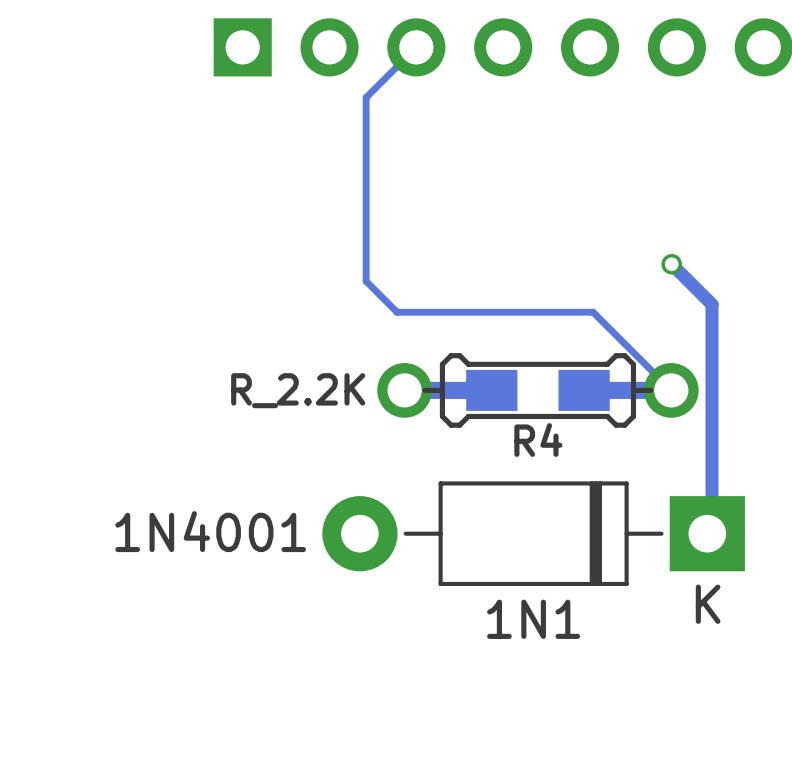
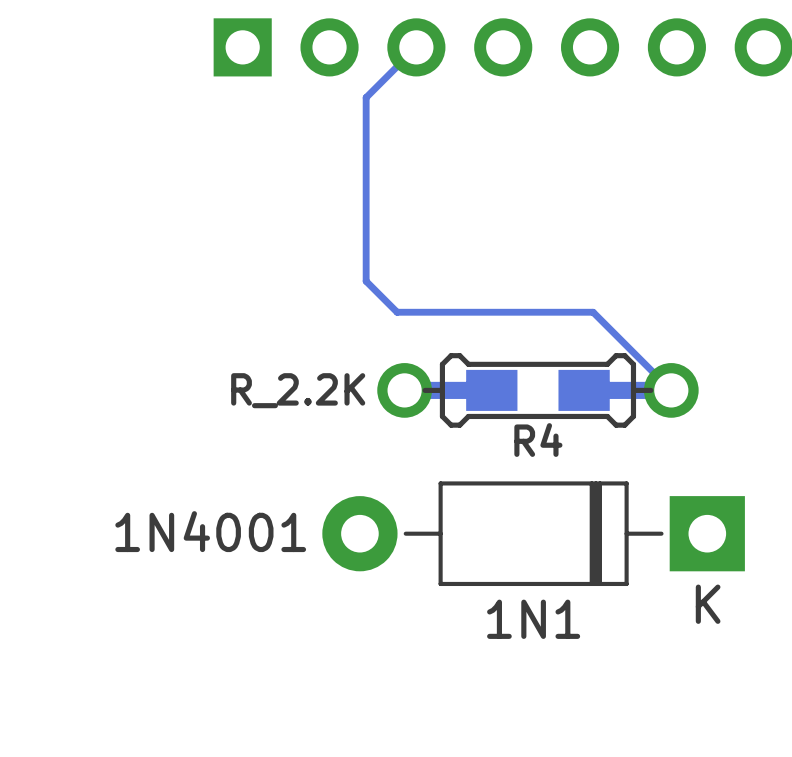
track: (671, 263) (712, 304) (712, 529) (707, 533) -> none
via: (671, 264) -> none

